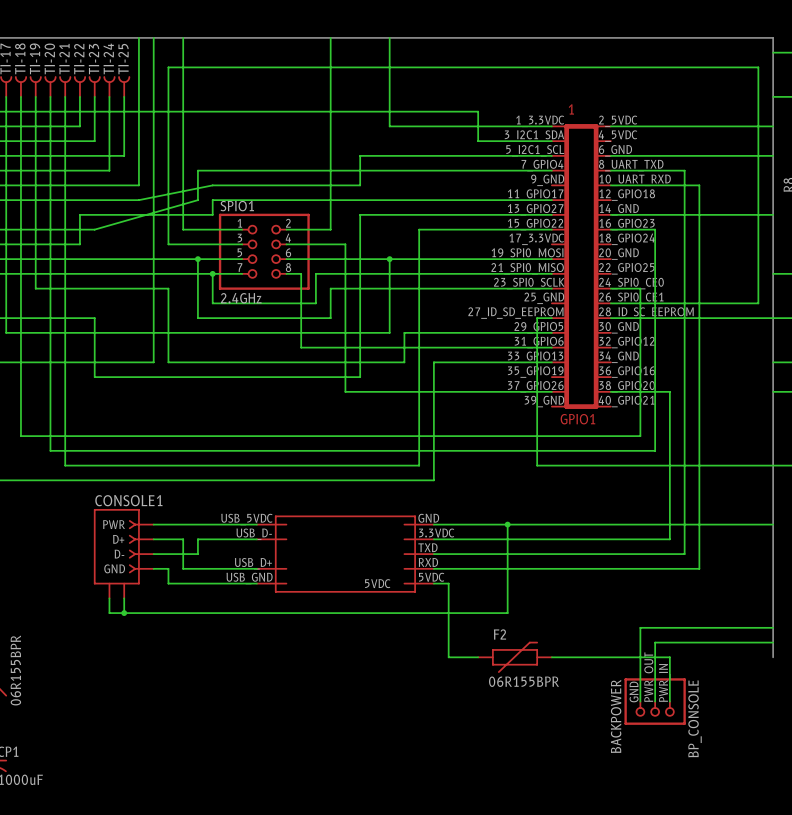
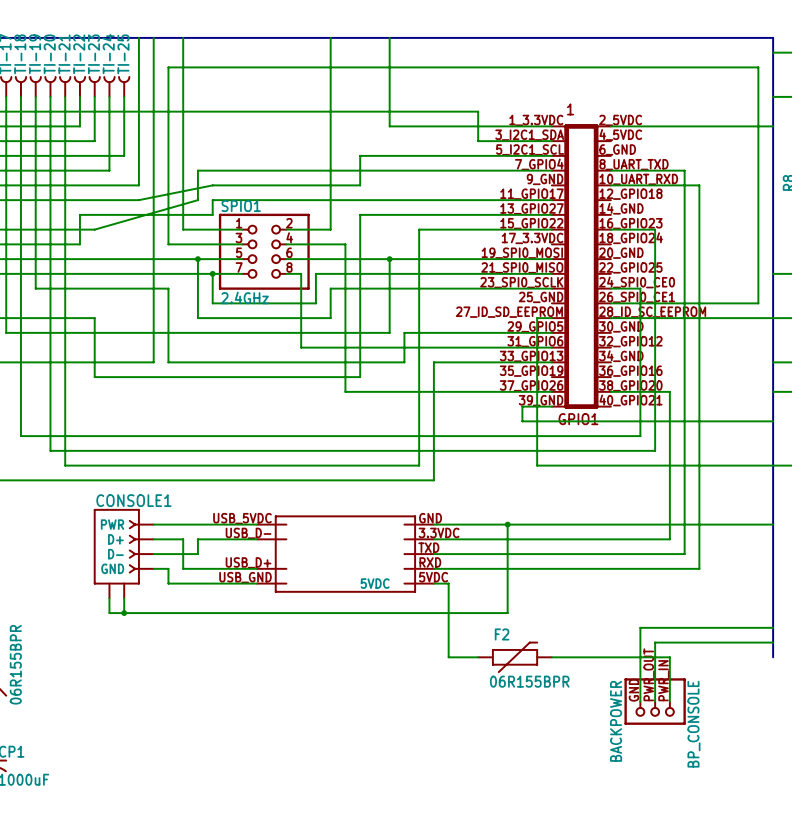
wire: (610, 155) (773, 155) -> none
wire: (610, 214) (773, 214) -> none
wire: none -> (551, 406) (522, 406) (522, 421) (773, 421)

